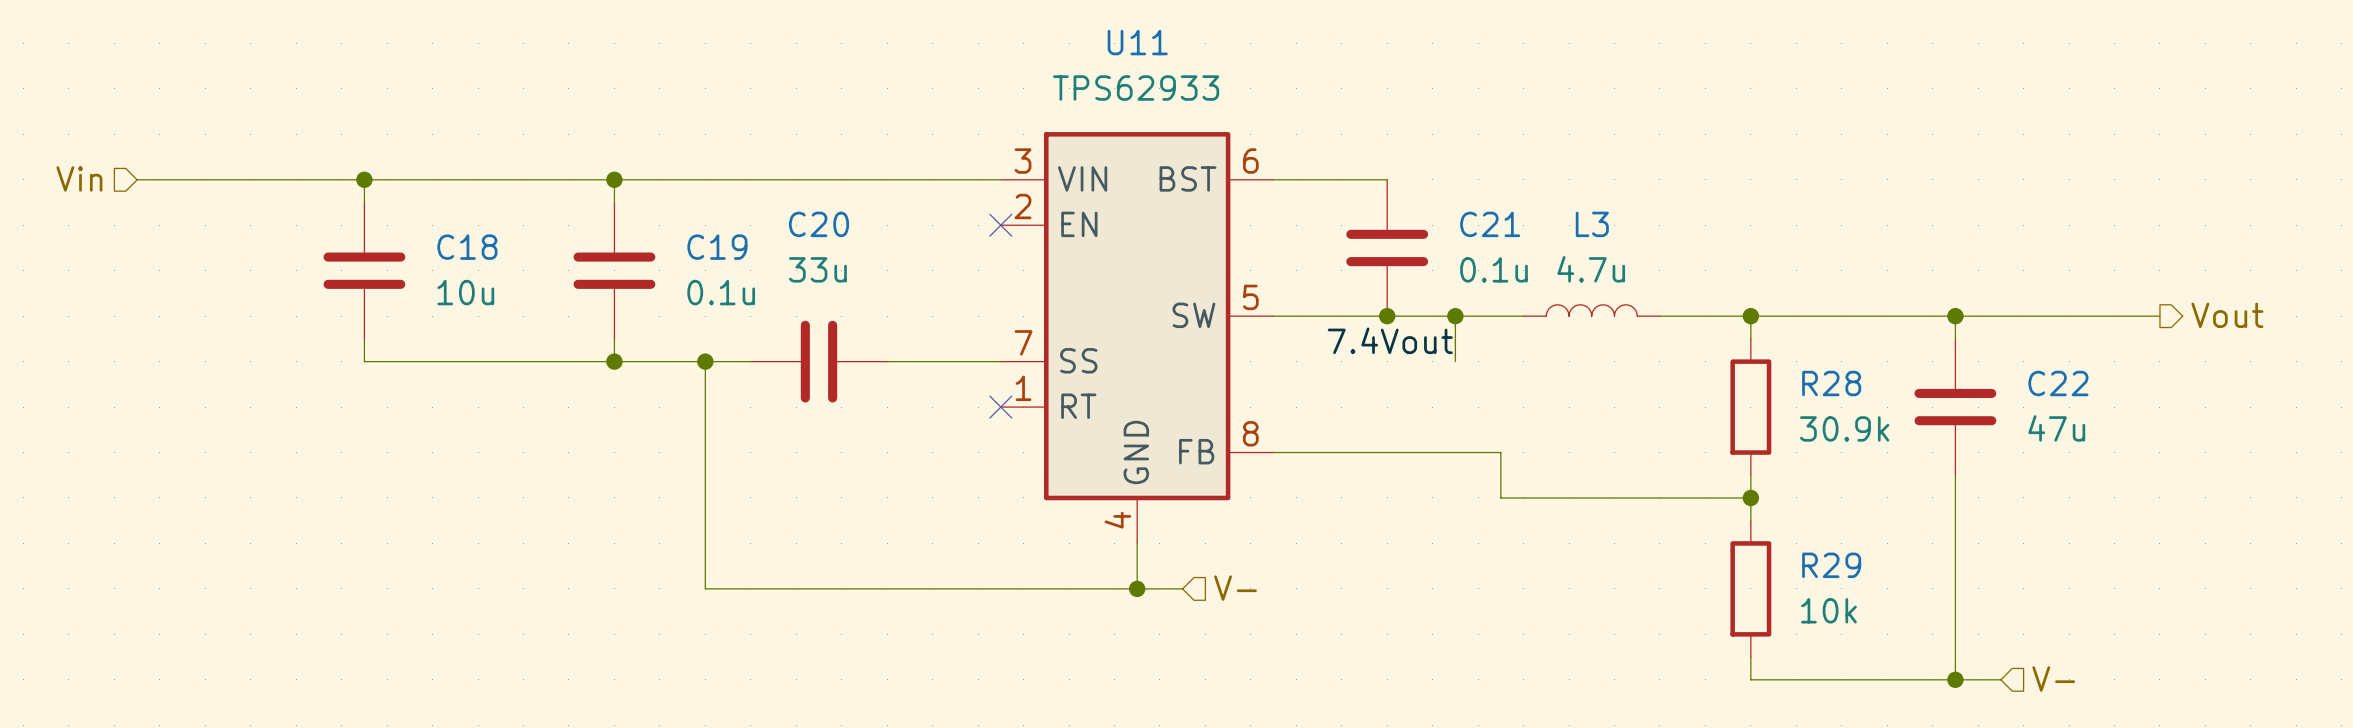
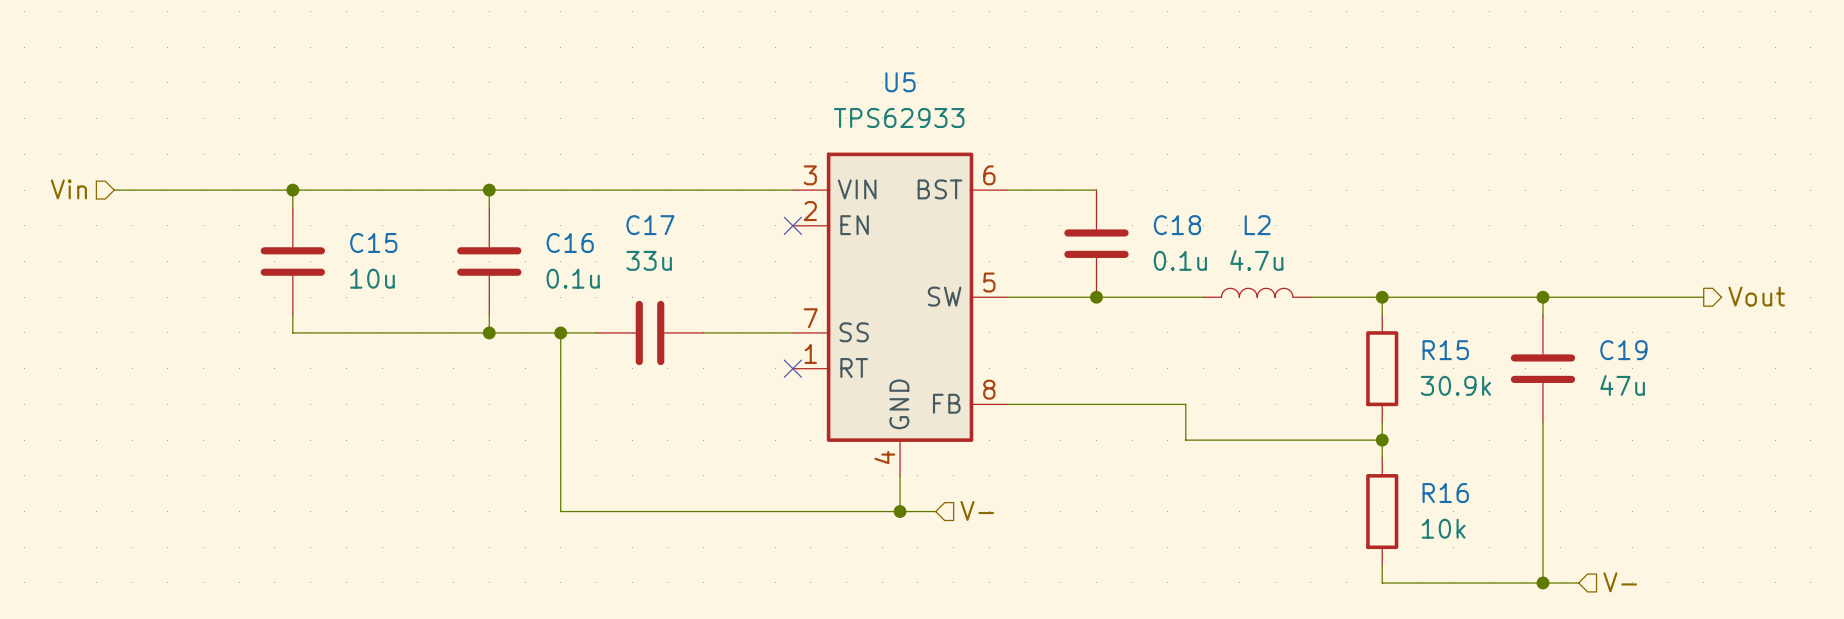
U11 name: U11 (1137, 42) -> U5 (900, 82)
C20 name: C20 (818, 224) -> C17 (650, 225)
C21 name: C21 (1490, 224) -> C18 (1177, 225)
L3 name: L3 (1592, 224) -> L2 (1257, 225)
C18 name: C18 (467, 247) -> C15 (373, 243)
C19 name: C19 (717, 247) -> C16 (570, 243)
wire: (1455, 316) (1455, 361) -> none
junction: (1455, 316) -> none
label: 7.4Vout (1390, 340) -> none
R28 name: R28 (1831, 383) -> R15 (1445, 350)
C22 name: C22 (2058, 383) -> C19 (1623, 350)
R29 name: R29 (1831, 565) -> R16 (1445, 493)

